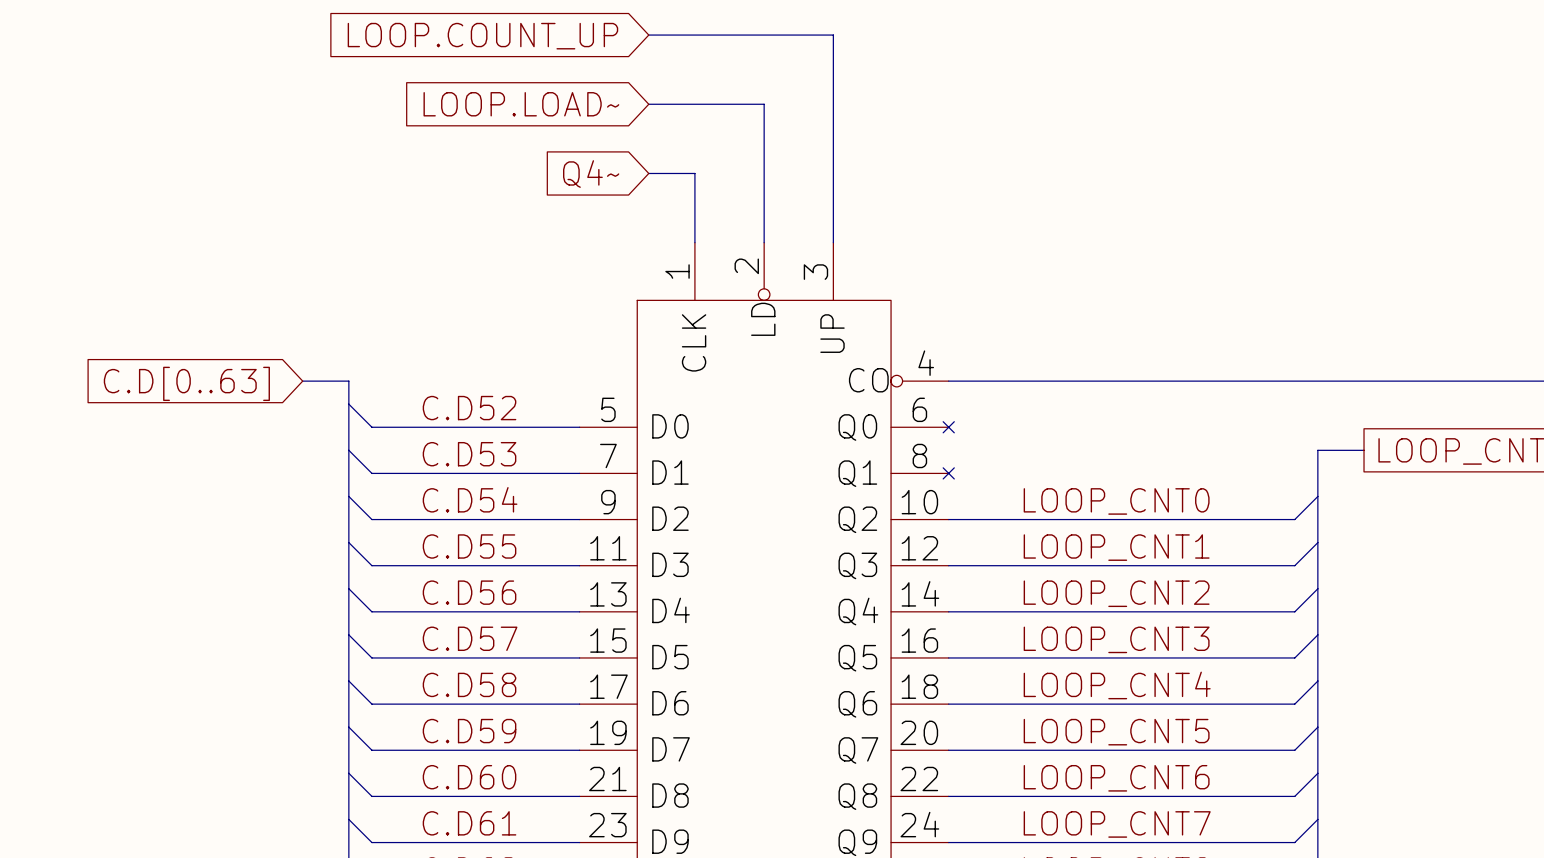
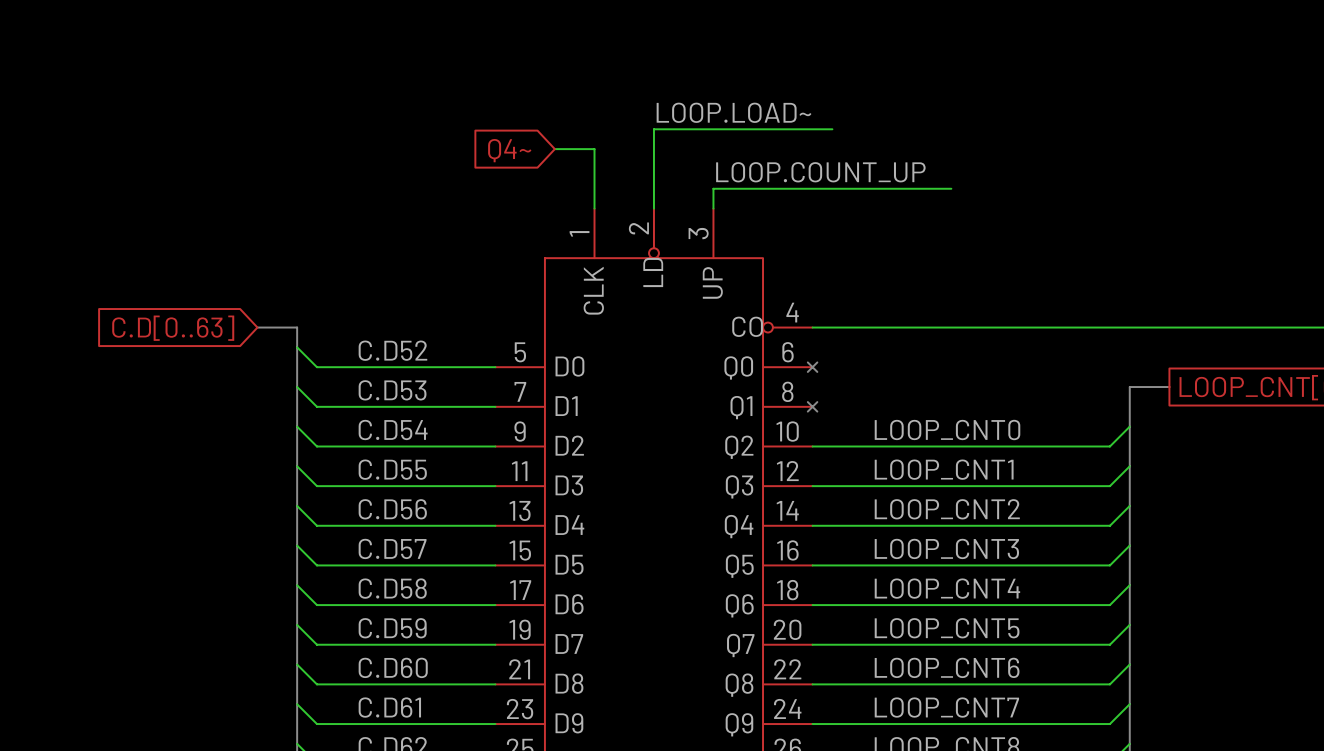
wire: (648, 35) (833, 35) (833, 219) -> (951, 188) (713, 188)
global label: LOOP.COUNT_UP (482, 36) -> none
global label: LOOP.LOAD~ (521, 104) -> none
wire: (648, 104) (764, 104) (764, 150) -> (832, 129) (653, 129)
label: none -> LOOP.LOAD~ (734, 112)
label: none -> LOOP.COUNT_UP (820, 172)

